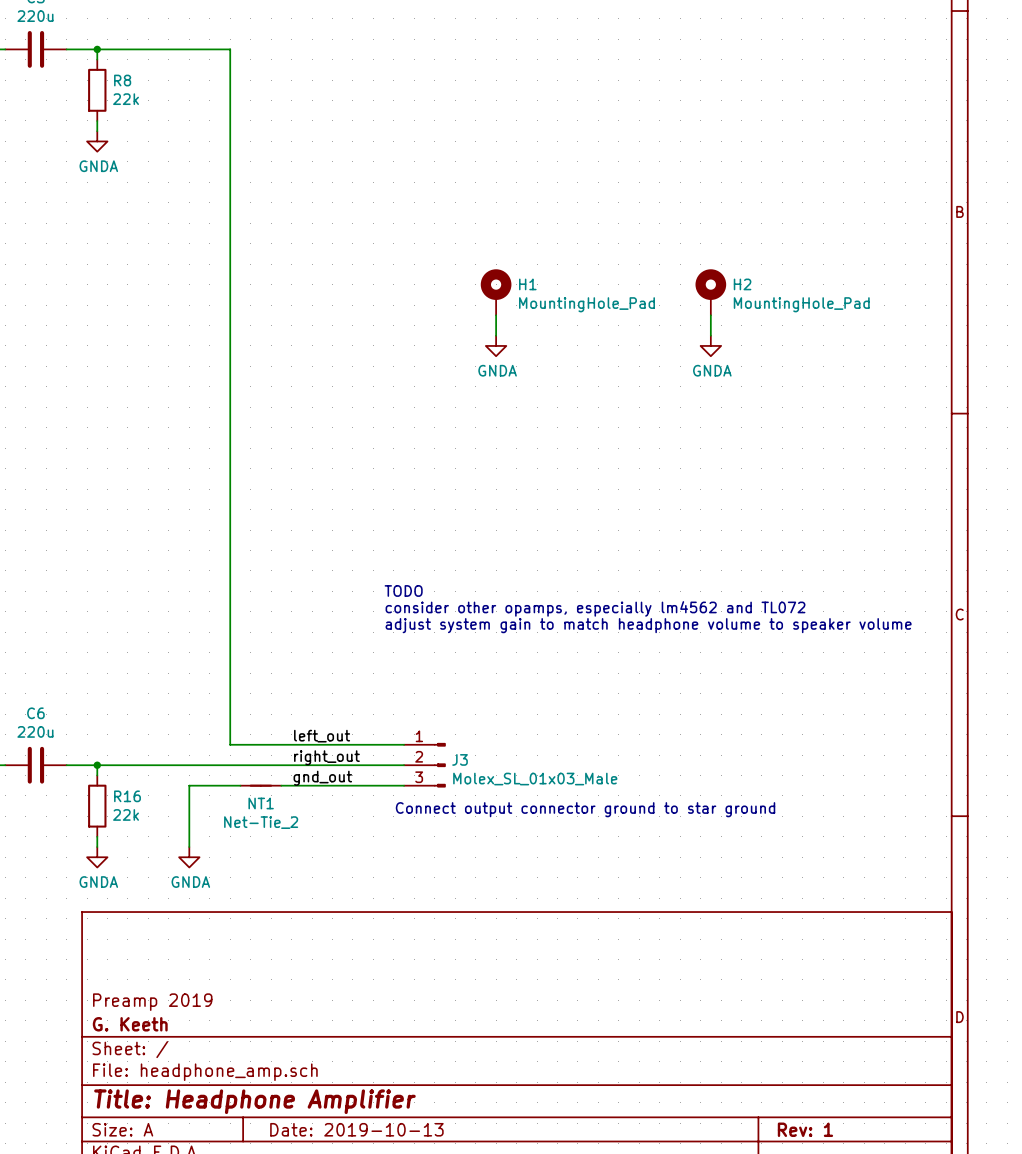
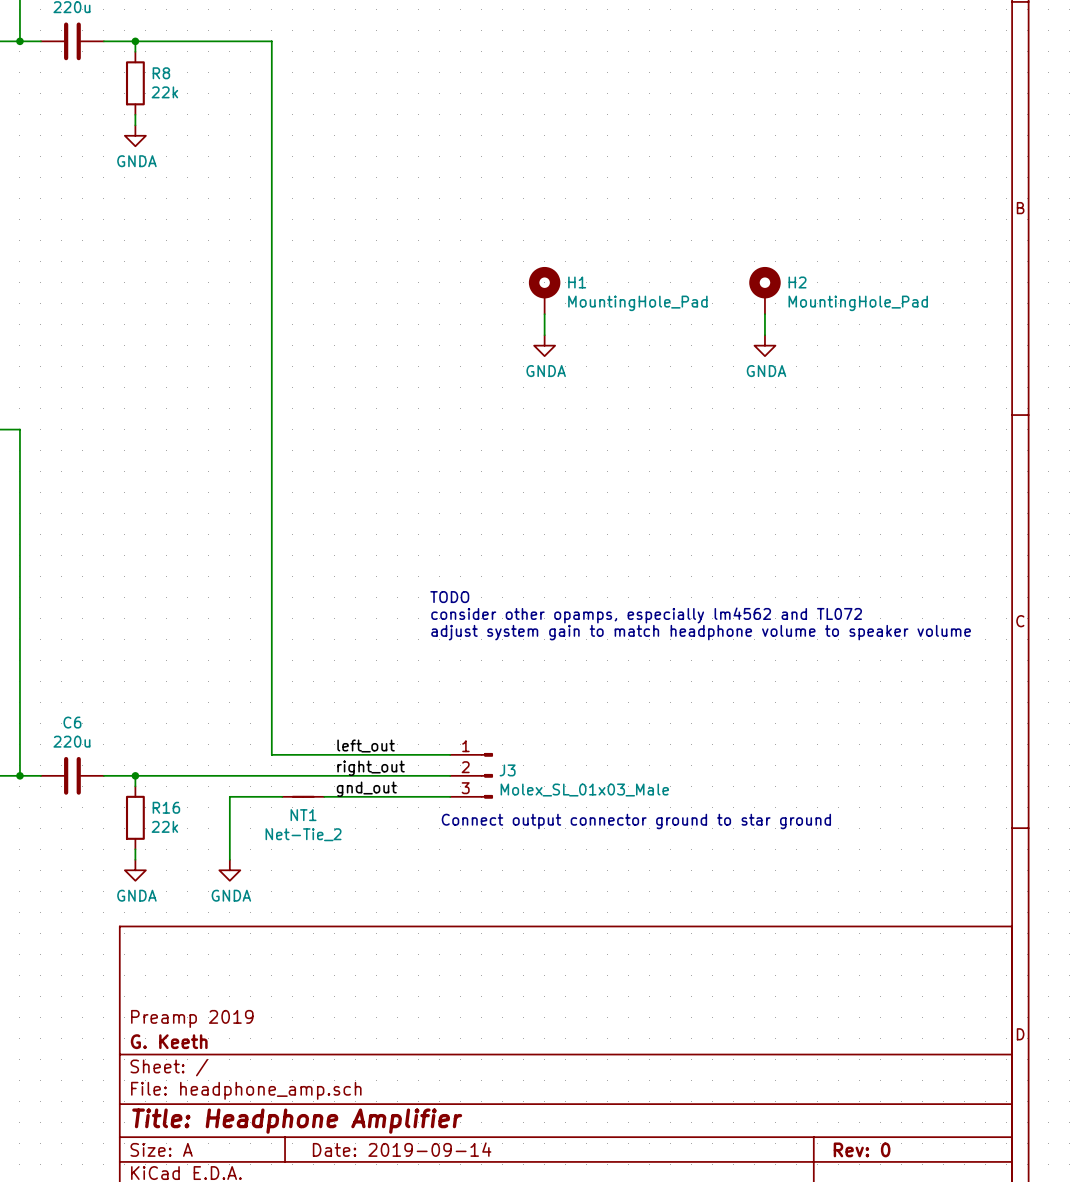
title block: Date: 2019-10-13 (356, 1129) -> Date: 2019-09-14 (402, 1149)
title block: Rev: 1 (805, 1129) -> Rev: 0 (862, 1149)

